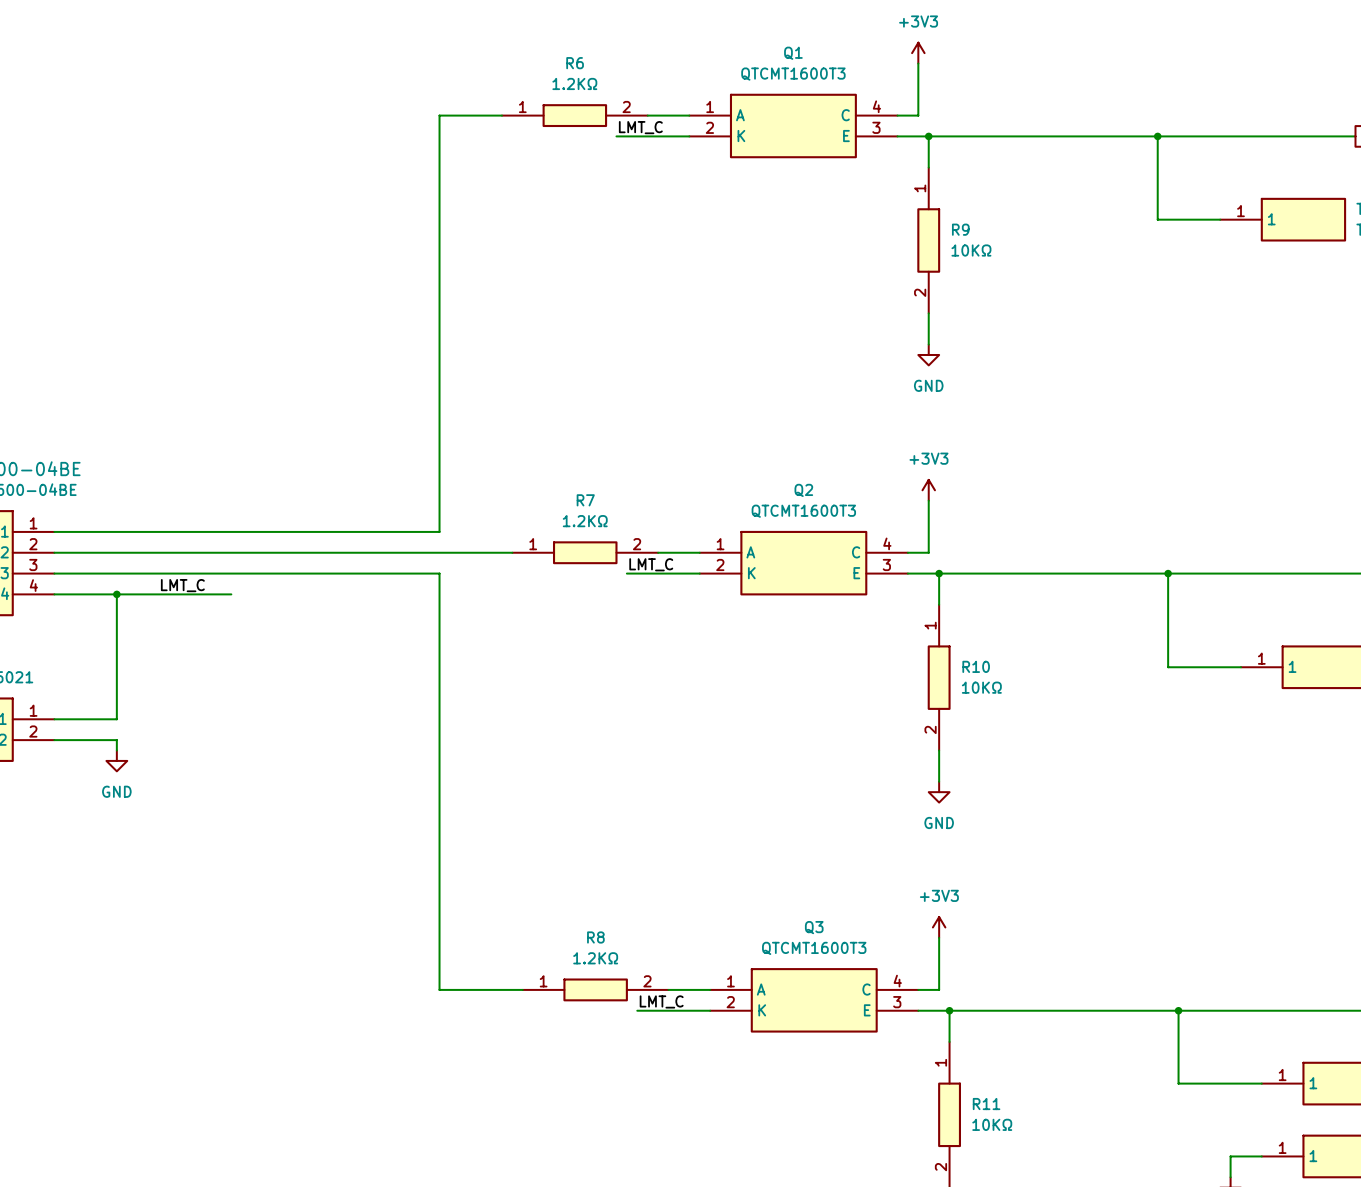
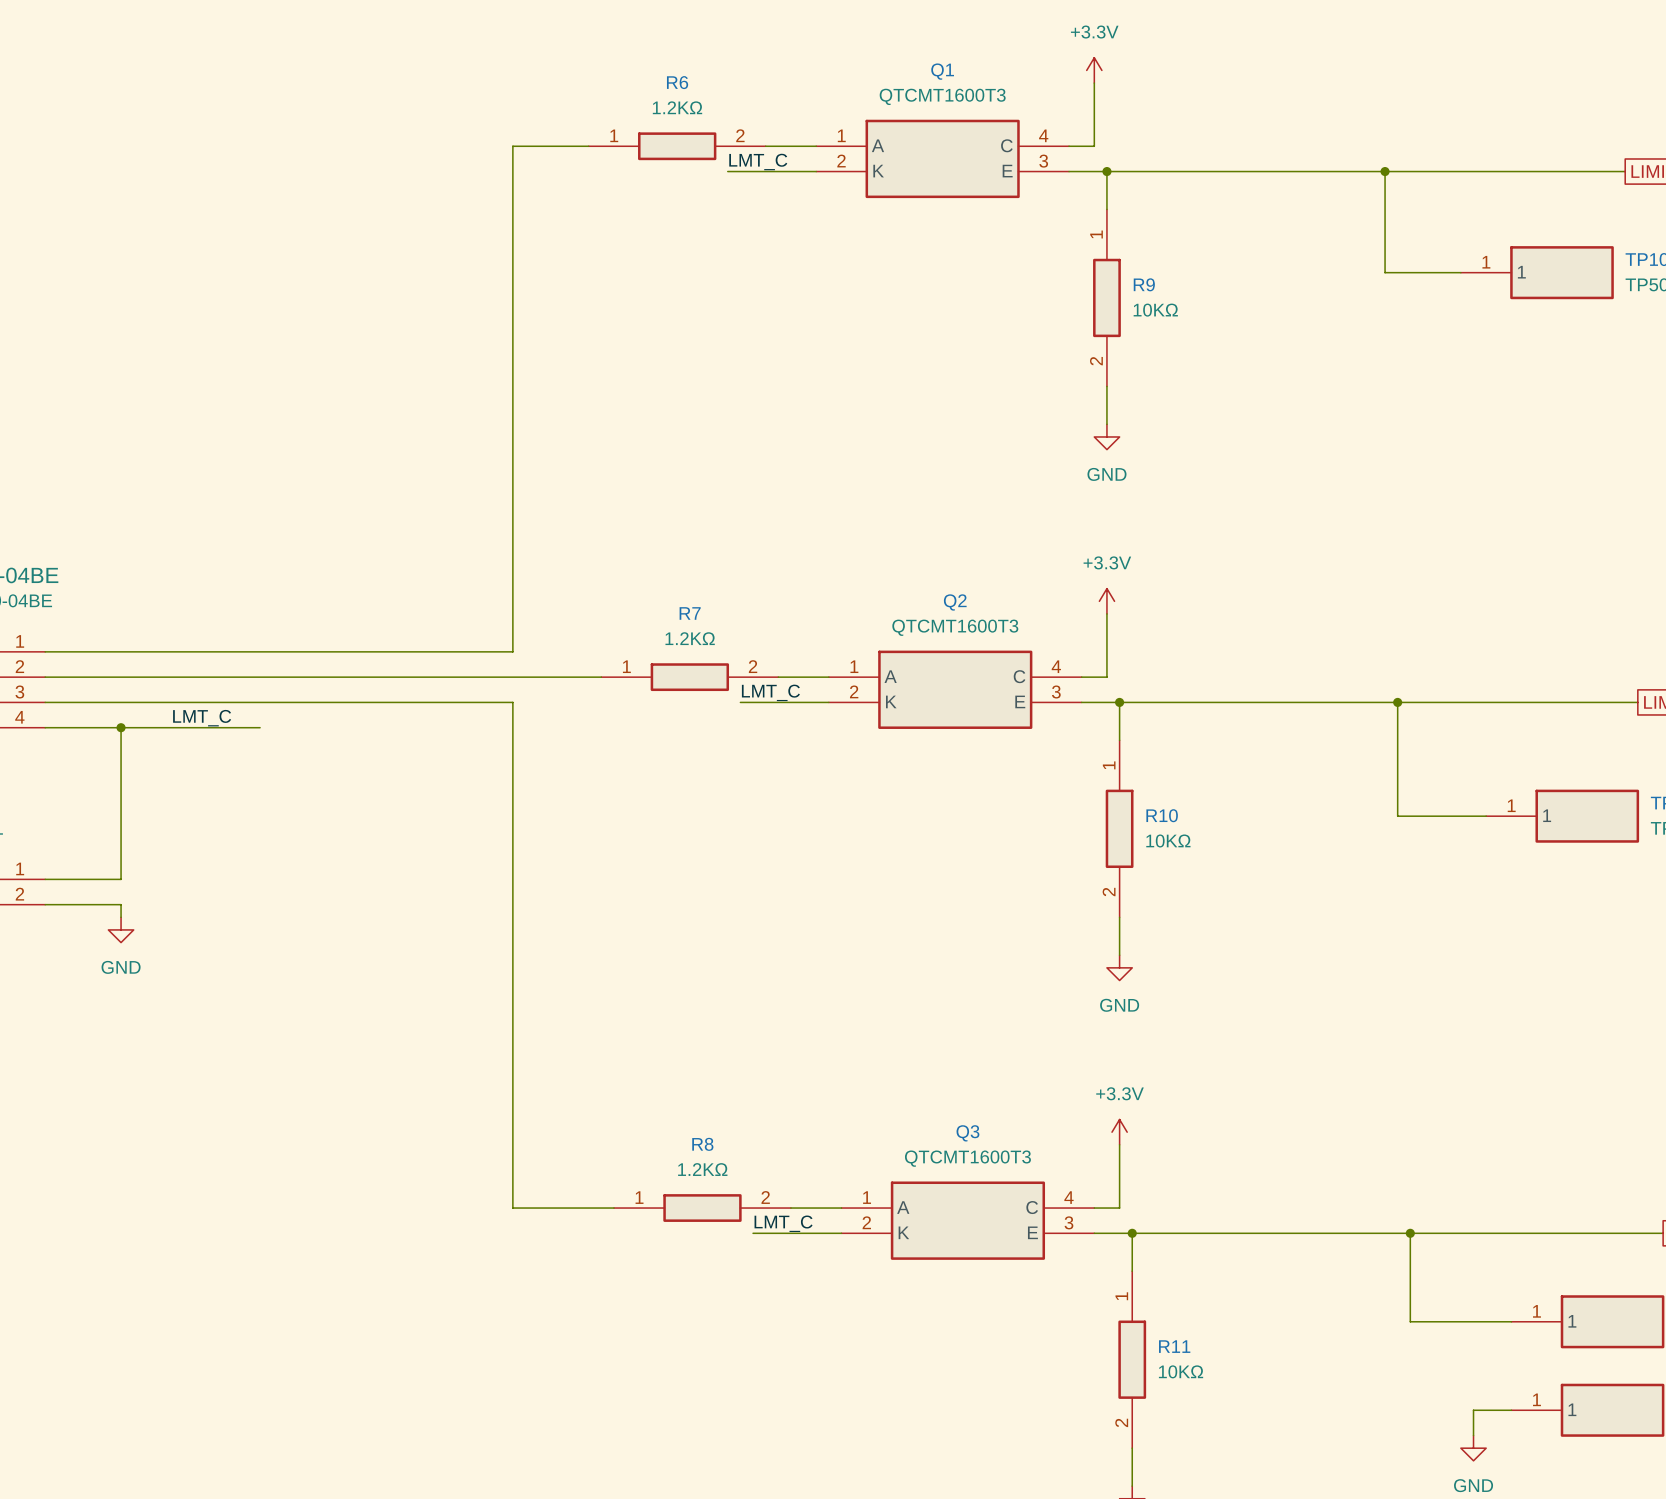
power symbol: +3V3 (918, 53) -> +3.3V (1094, 70)
power symbol: +3V3 (928, 490) -> +3.3V (1106, 601)
power symbol: +3V3 (939, 927) -> +3.3V (1119, 1132)

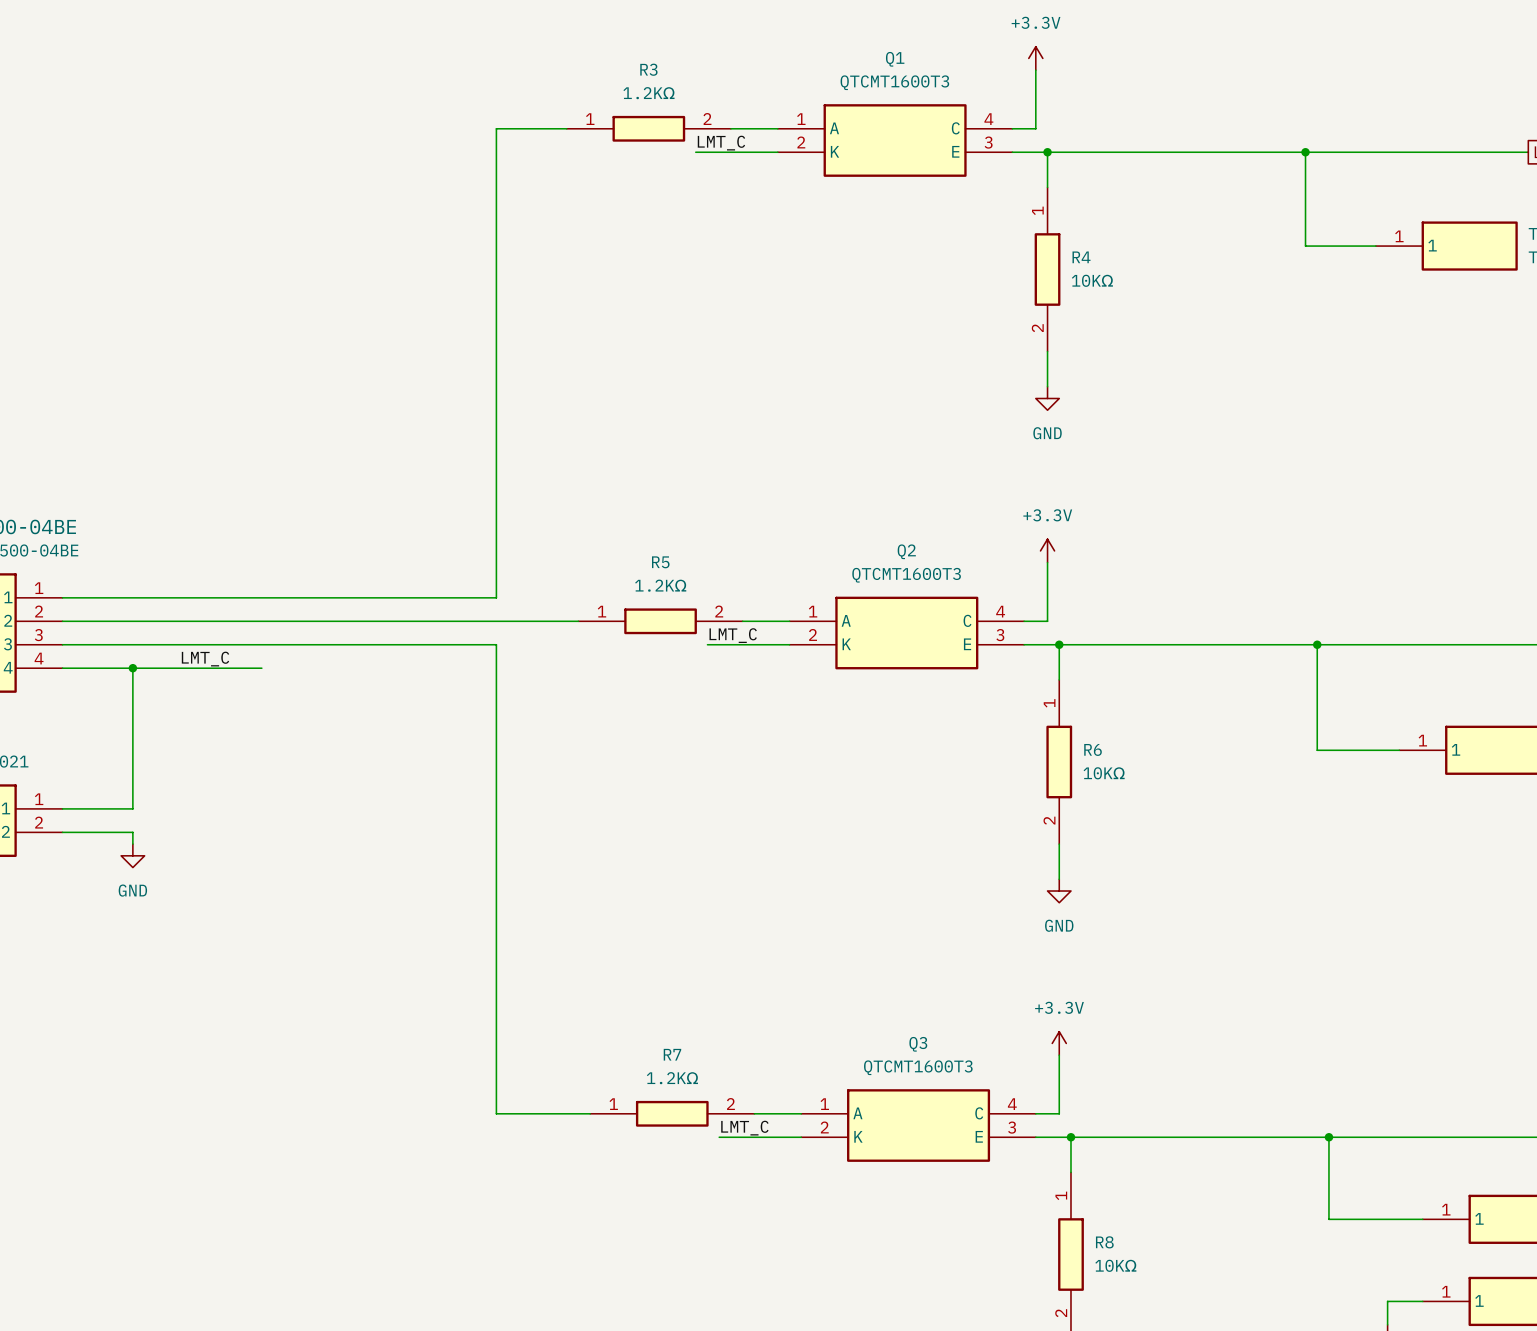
R6 name: R6 (677, 82) -> R3 (648, 69)
R9 name: R9 (1144, 284) -> R4 (1081, 257)
R7 name: R7 (690, 613) -> R5 (660, 562)
R10 name: R10 (1162, 815) -> R6 (1093, 749)
R8 name: R8 (702, 1144) -> R7 (672, 1054)
R11 name: R11 (1174, 1346) -> R8 (1104, 1242)

